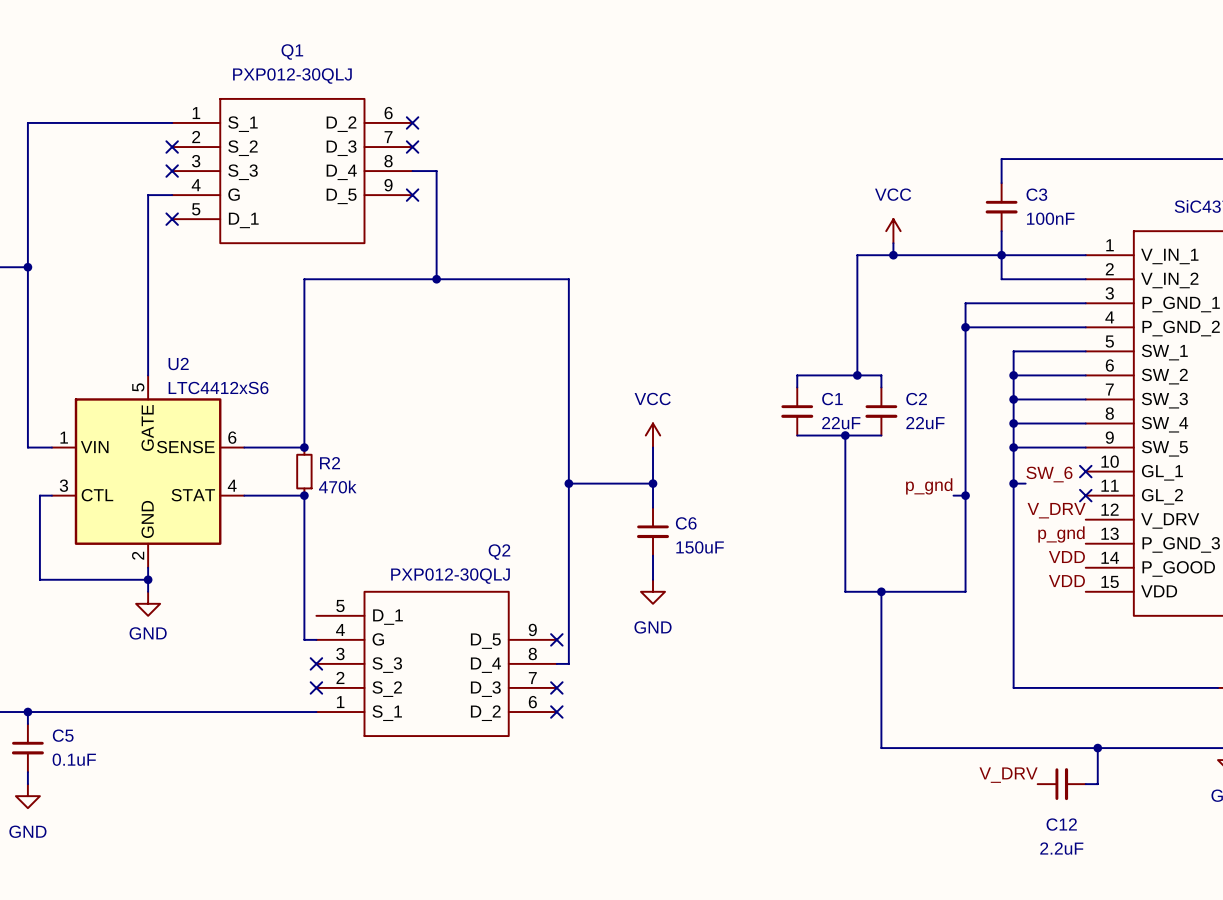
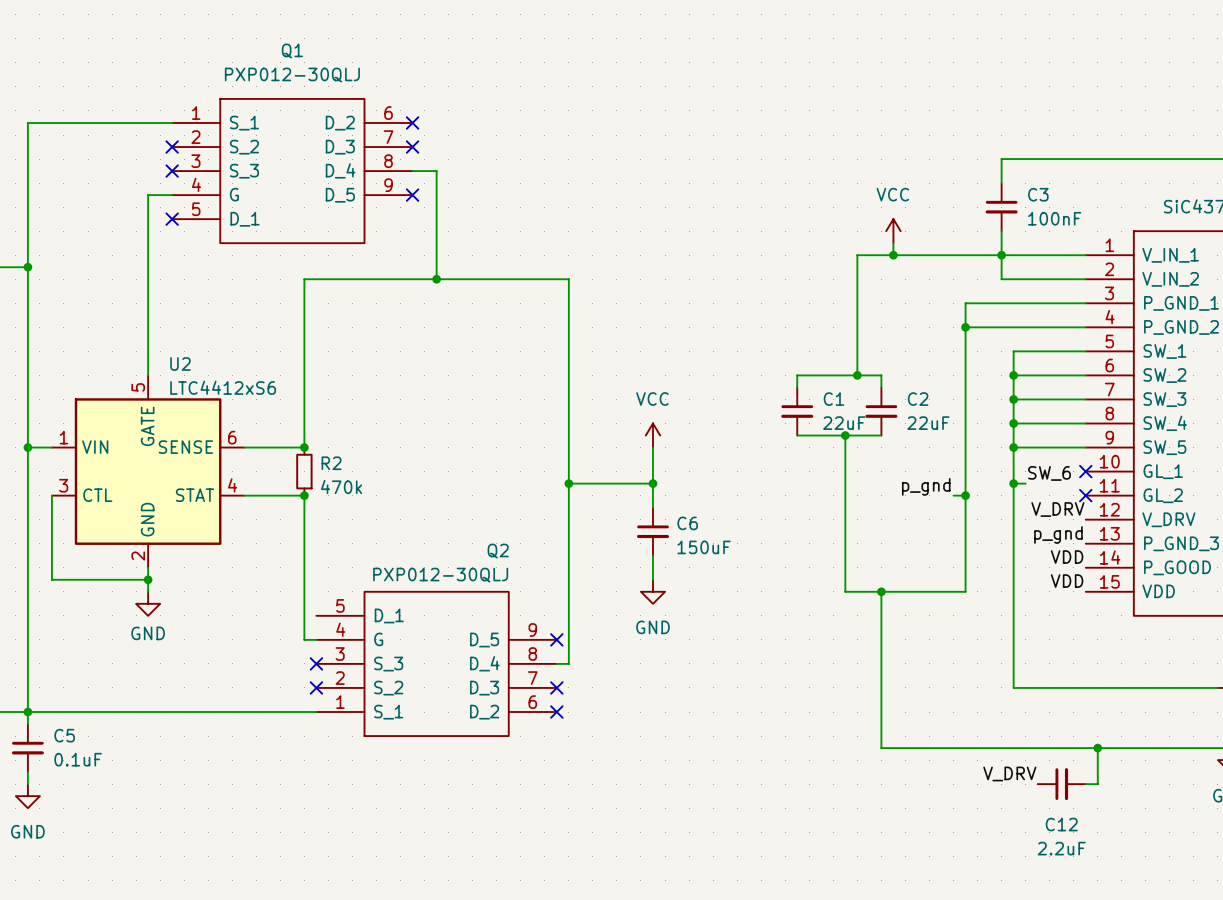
wire: none -> (27, 447) (27, 712)
junction: none -> (27, 447)
wire: (51, 495) (39, 495) (39, 579) (51, 579) -> (51, 495) (51, 579)

